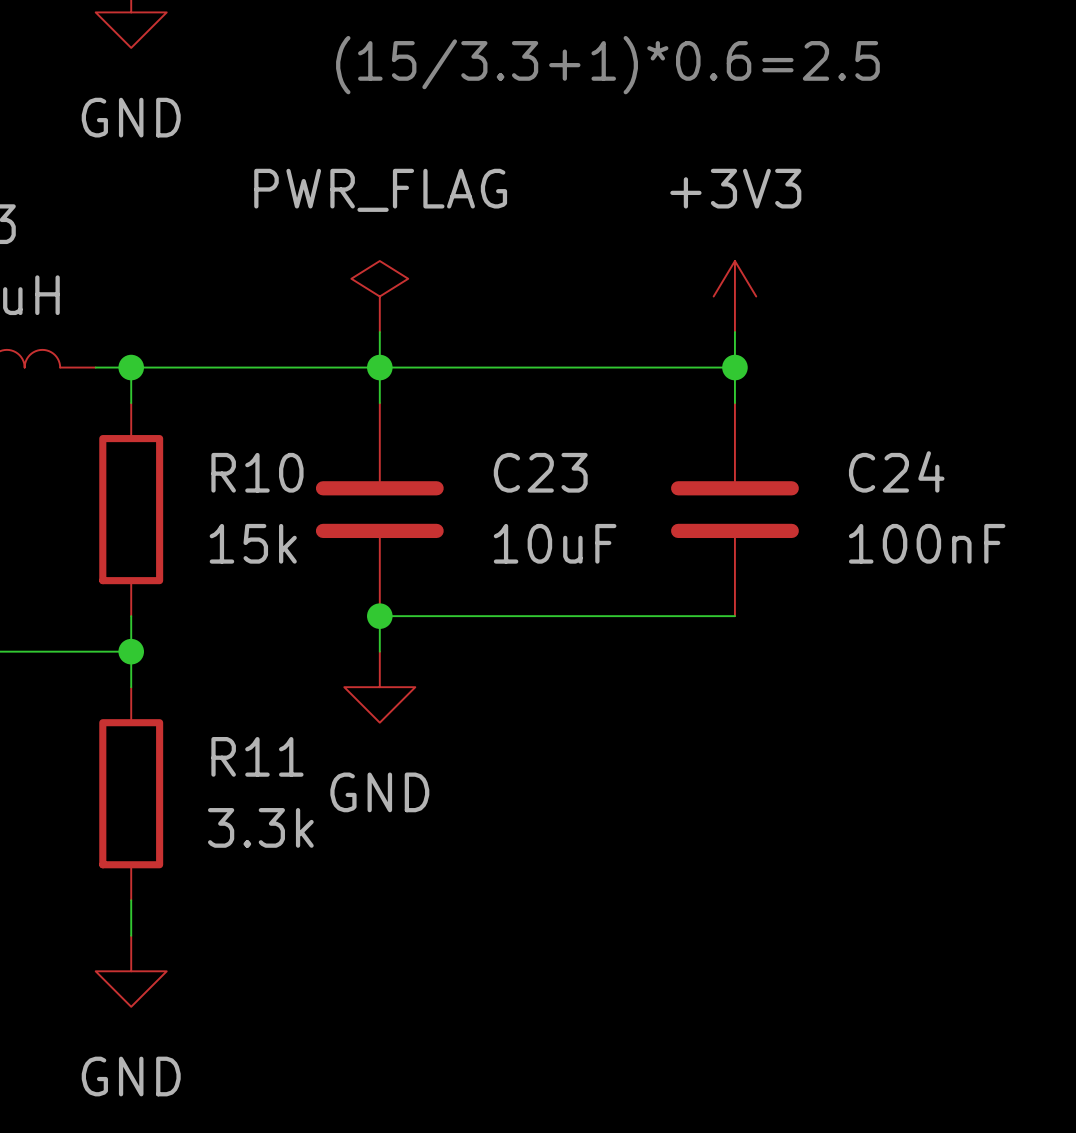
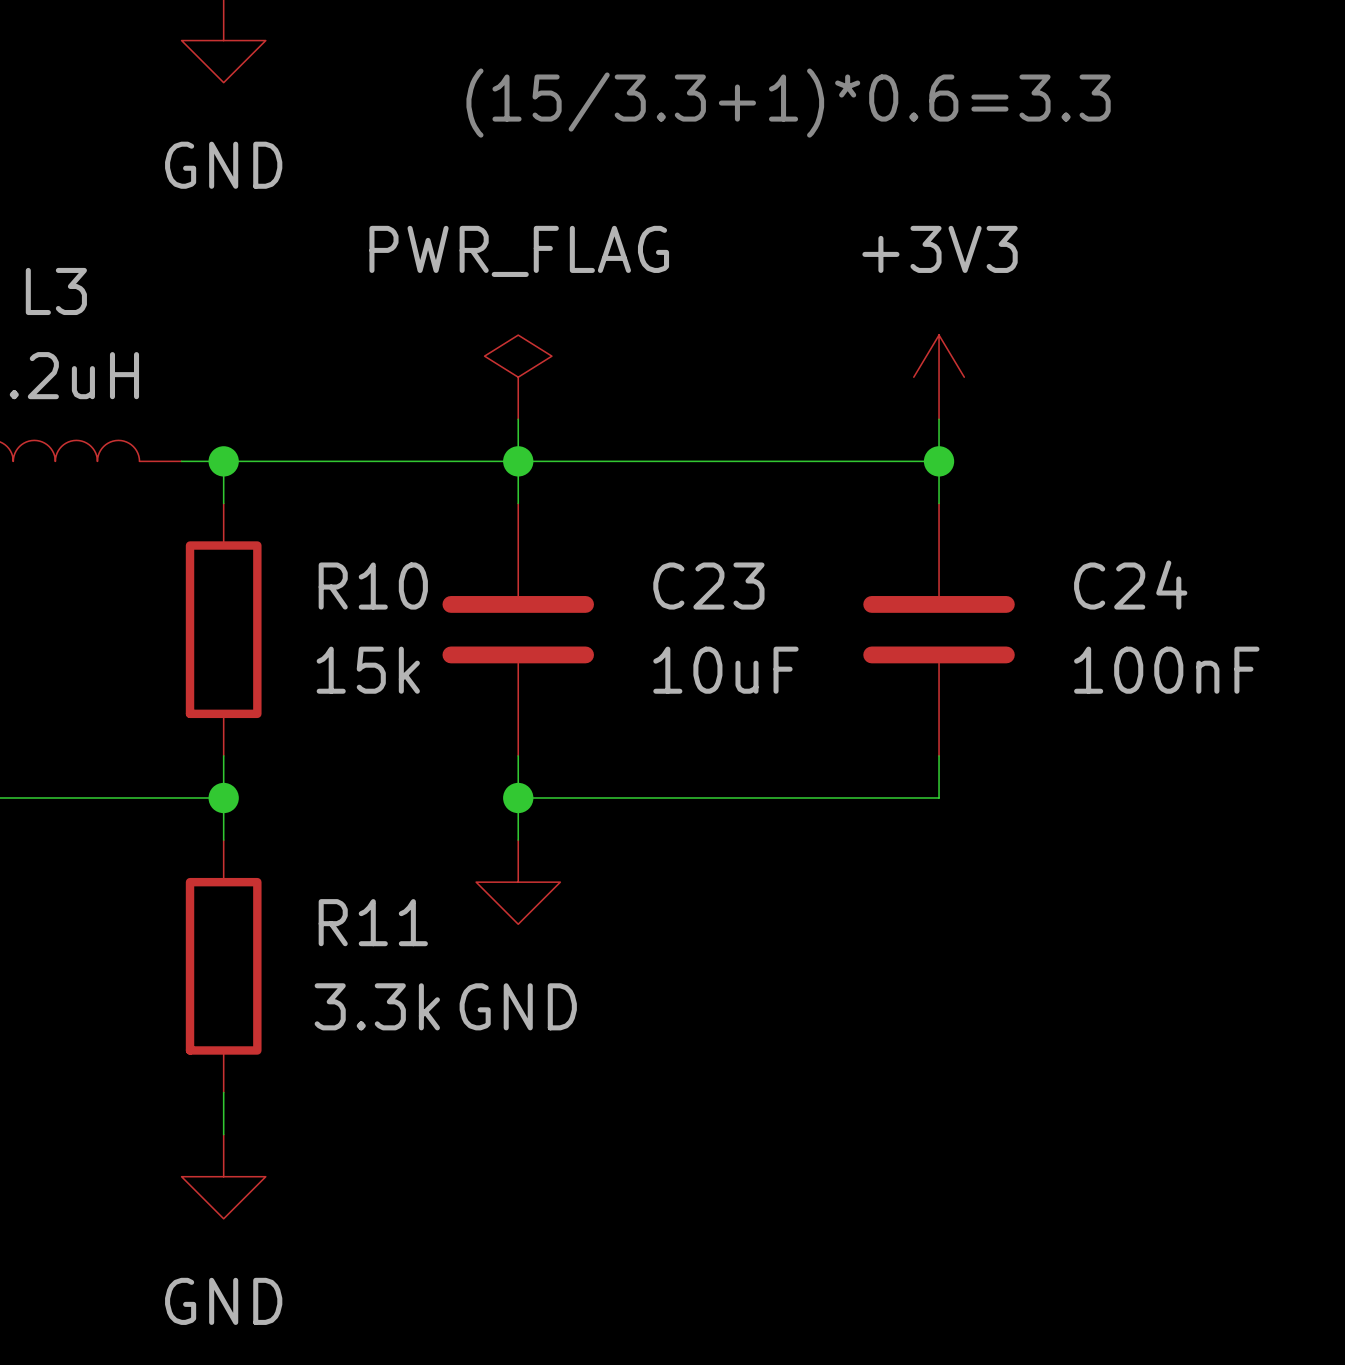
text: (15/3.3+1)*0.6=2.5 (607, 65) -> (15/3.3+1)*0.6=3.3 (788, 103)
wire: (379, 616) (734, 616) -> (518, 840) (518, 798) (939, 798) (939, 755)
junction position: (379, 616) -> (518, 798)
power symbol position: GND (379, 687) -> GND (518, 882)

